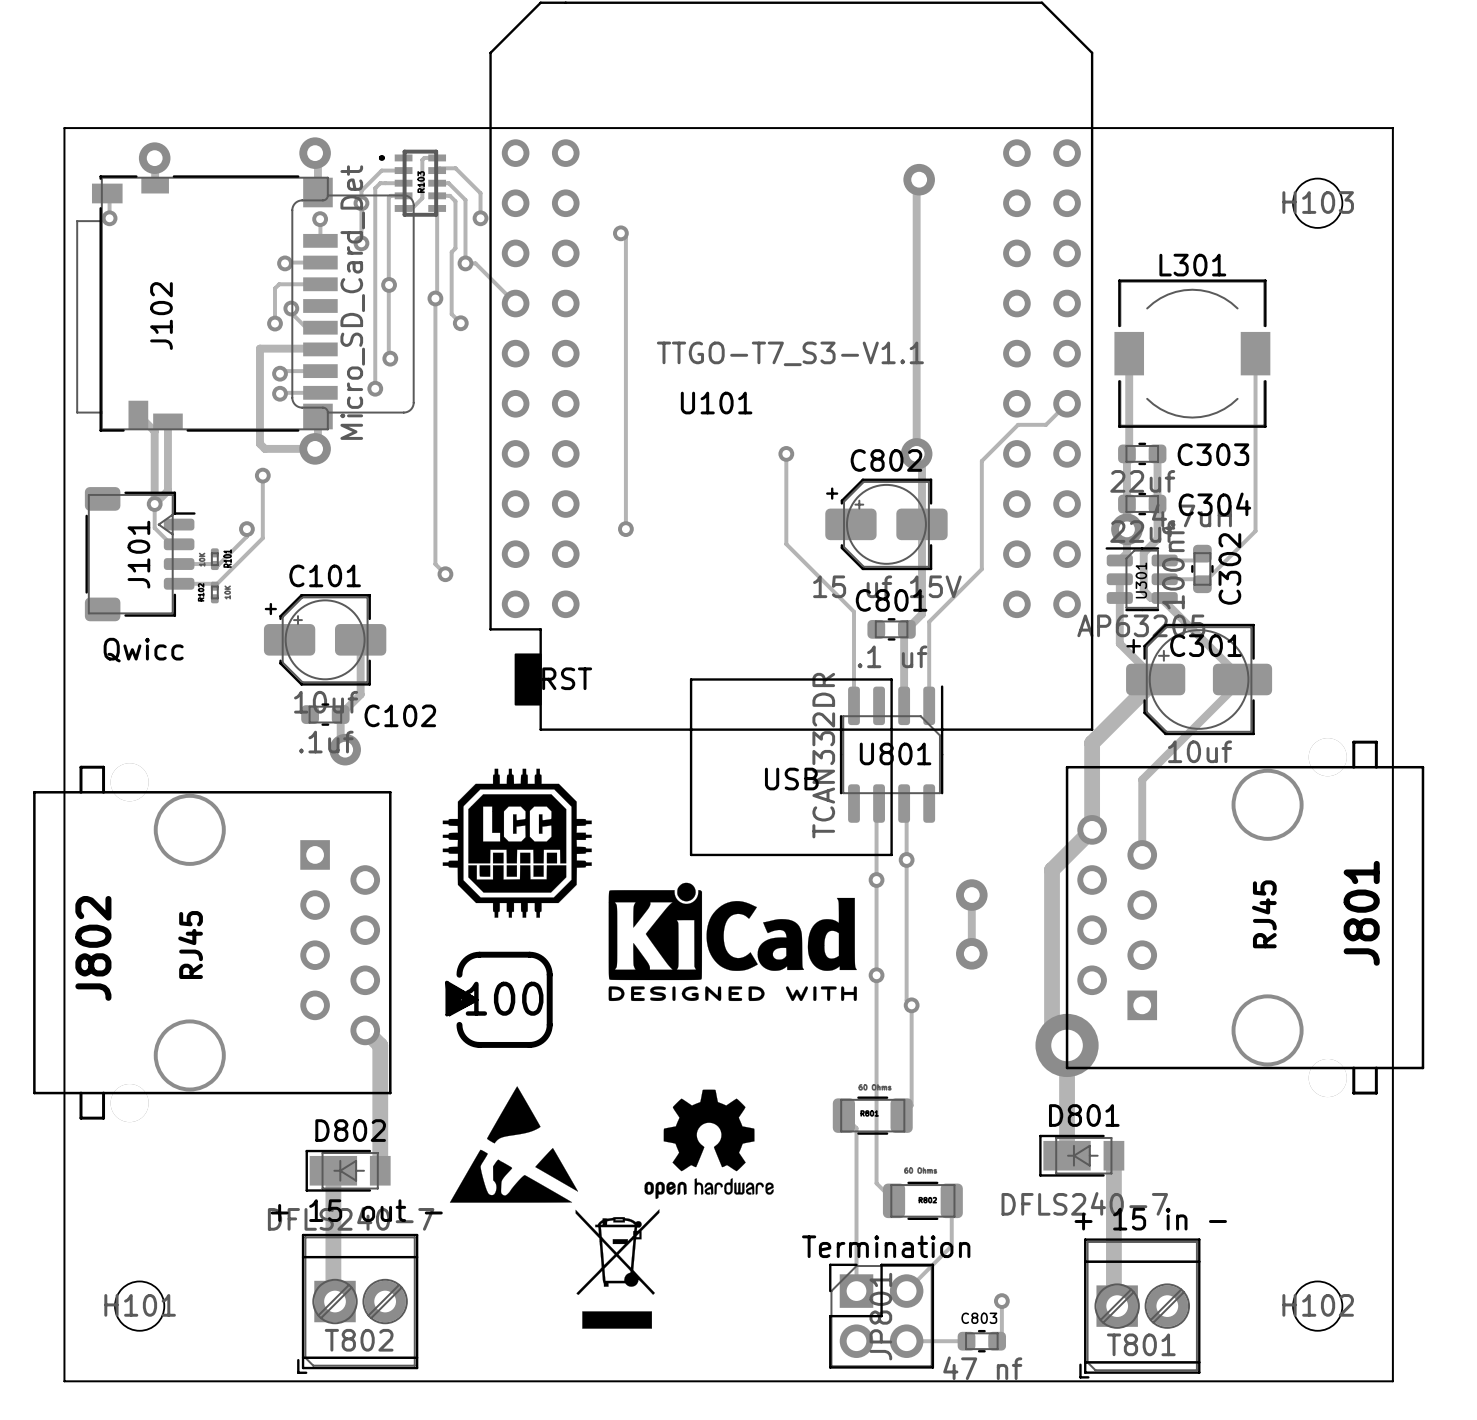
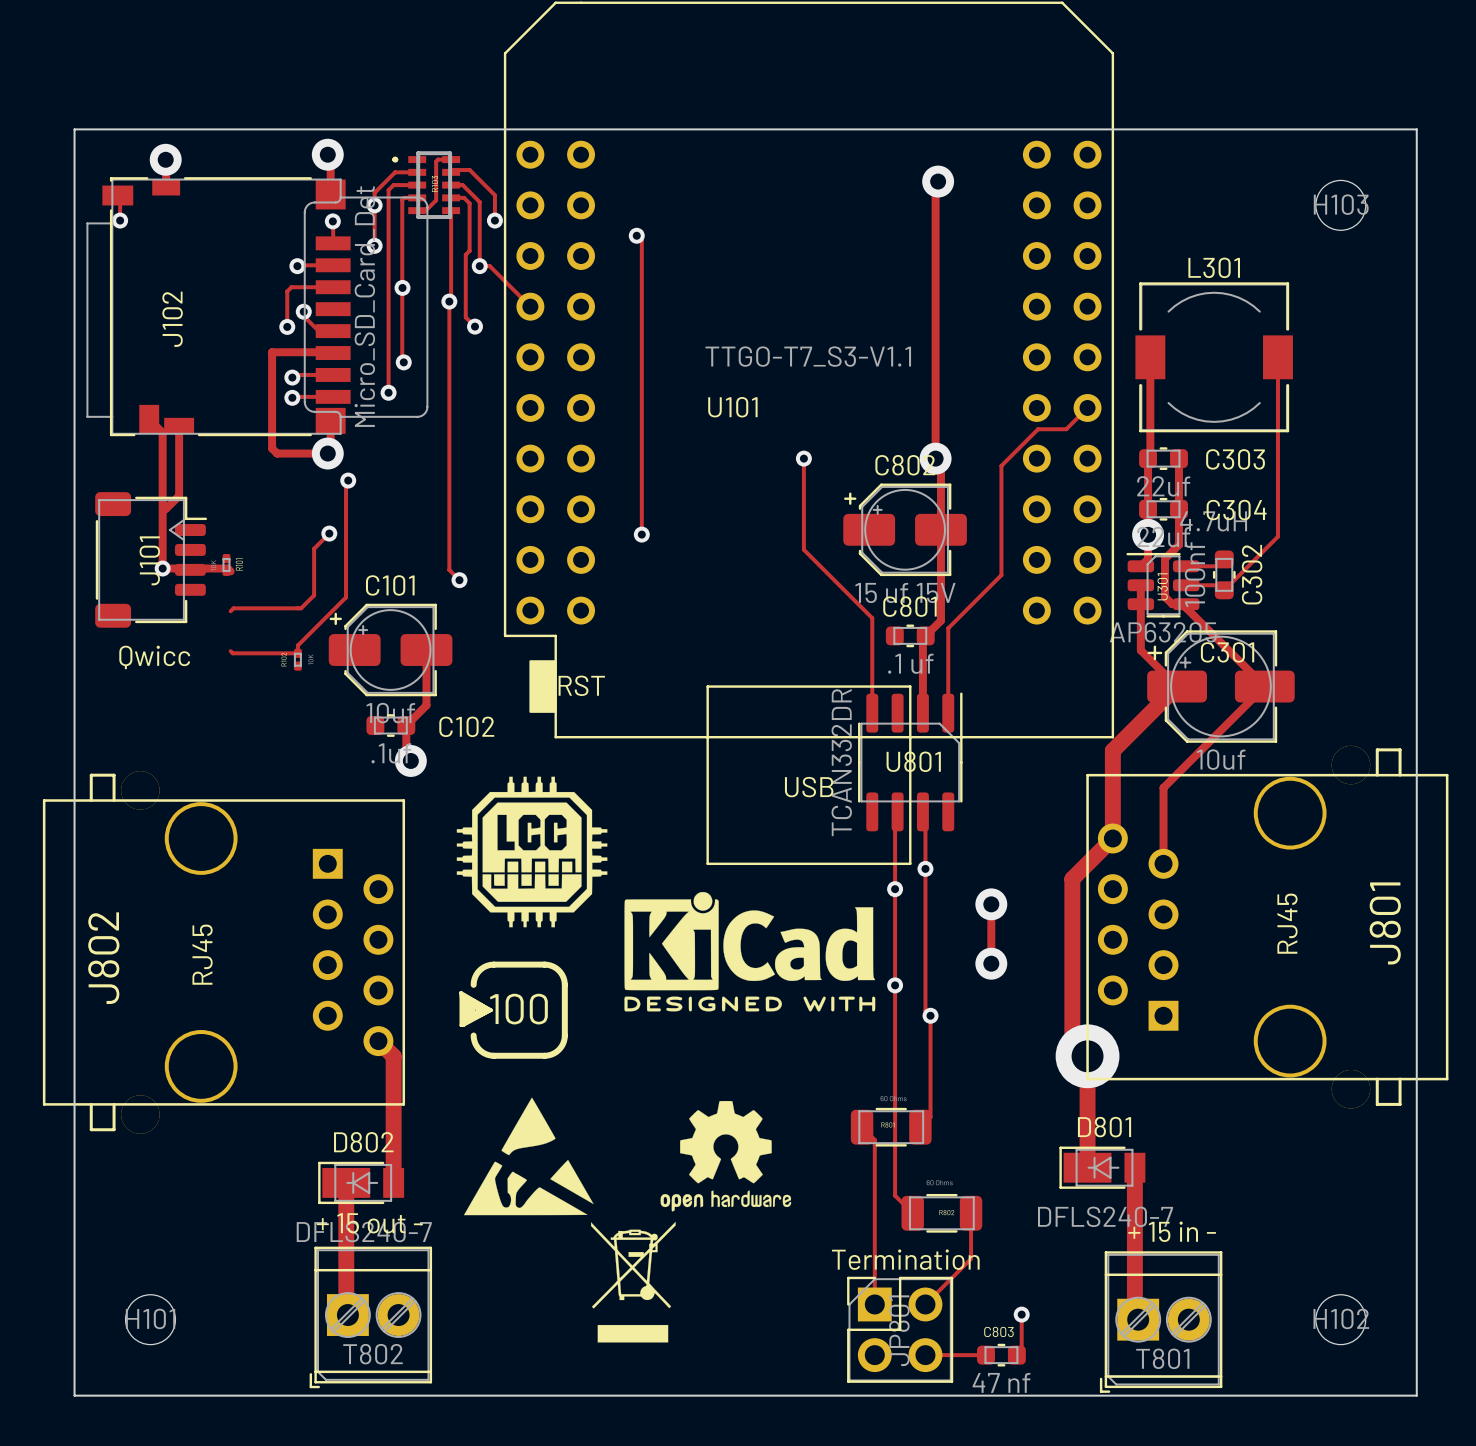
track: (151, 428) (154, 431) (154, 527) (171, 544) (179, 544) -> (162, 432) (162, 568) (227, 568) (230, 571)
track: (262, 475) (262, 538) (214, 586) (212, 583) (179, 583) -> none
via: (262, 475) -> none
track: none -> (348, 480) (346, 482) (346, 597) (297, 645) (297, 653) (232, 653) (230, 651)
via: none -> (348, 480)
via: (154, 504) -> none
track: none -> (329, 533) (314, 548) (314, 595) (301, 608) (233, 608) (230, 611)
via: none -> (329, 533)
track: (246, 529) (246, 536) (217, 565) (179, 564) -> none
via: (246, 529) -> none
via: none -> (162, 568)
part position: (214, 592) -> (297, 659)
C101 position: (325, 639) -> (390, 650)
track: (360, 639) (360, 694) (340, 714) (340, 745) (345, 749) -> (426, 650) (426, 705) (406, 725) (406, 756) (410, 760)
C102 position: (325, 714) -> (390, 725)
via position: (345, 749) -> (410, 760)

